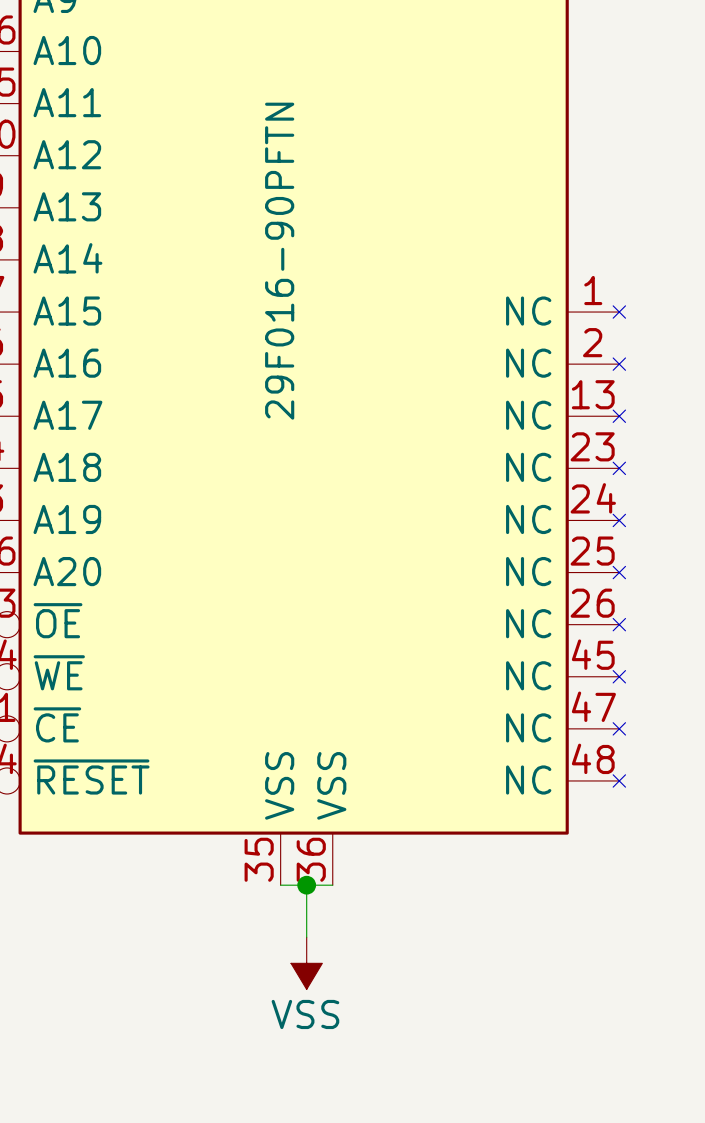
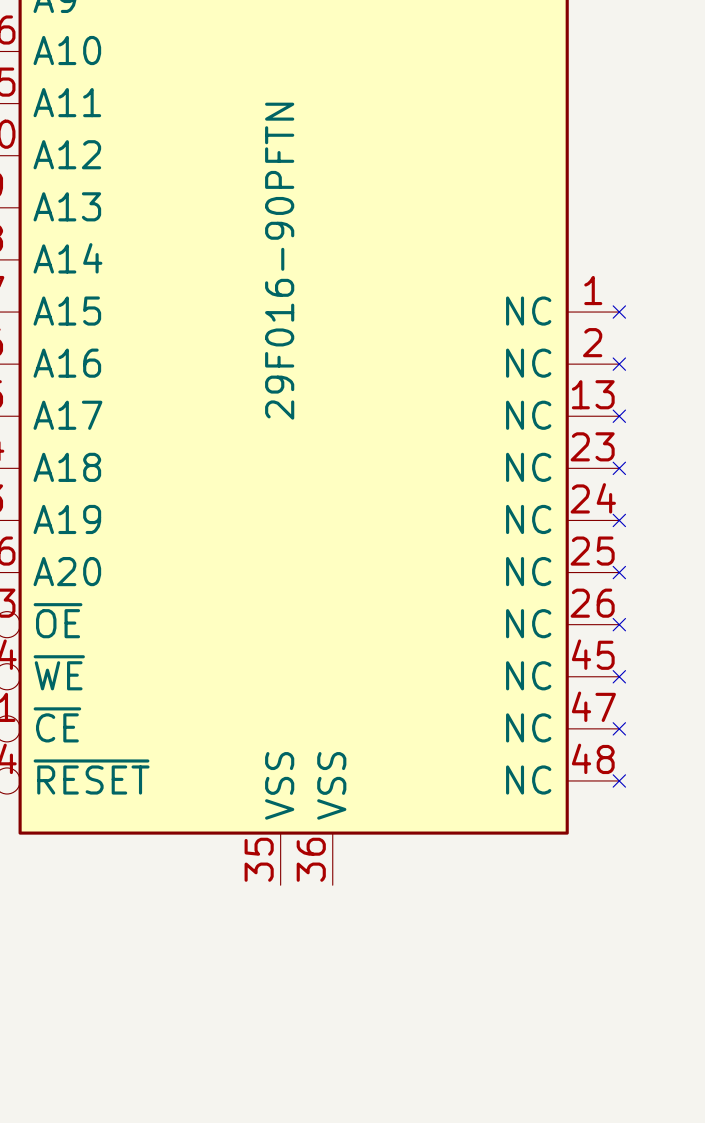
wire: (280, 885) (332, 885) -> none
wire: (306, 885) (306, 937) -> none
junction: (306, 885) -> none
power symbol: VSS (306, 963) -> none

